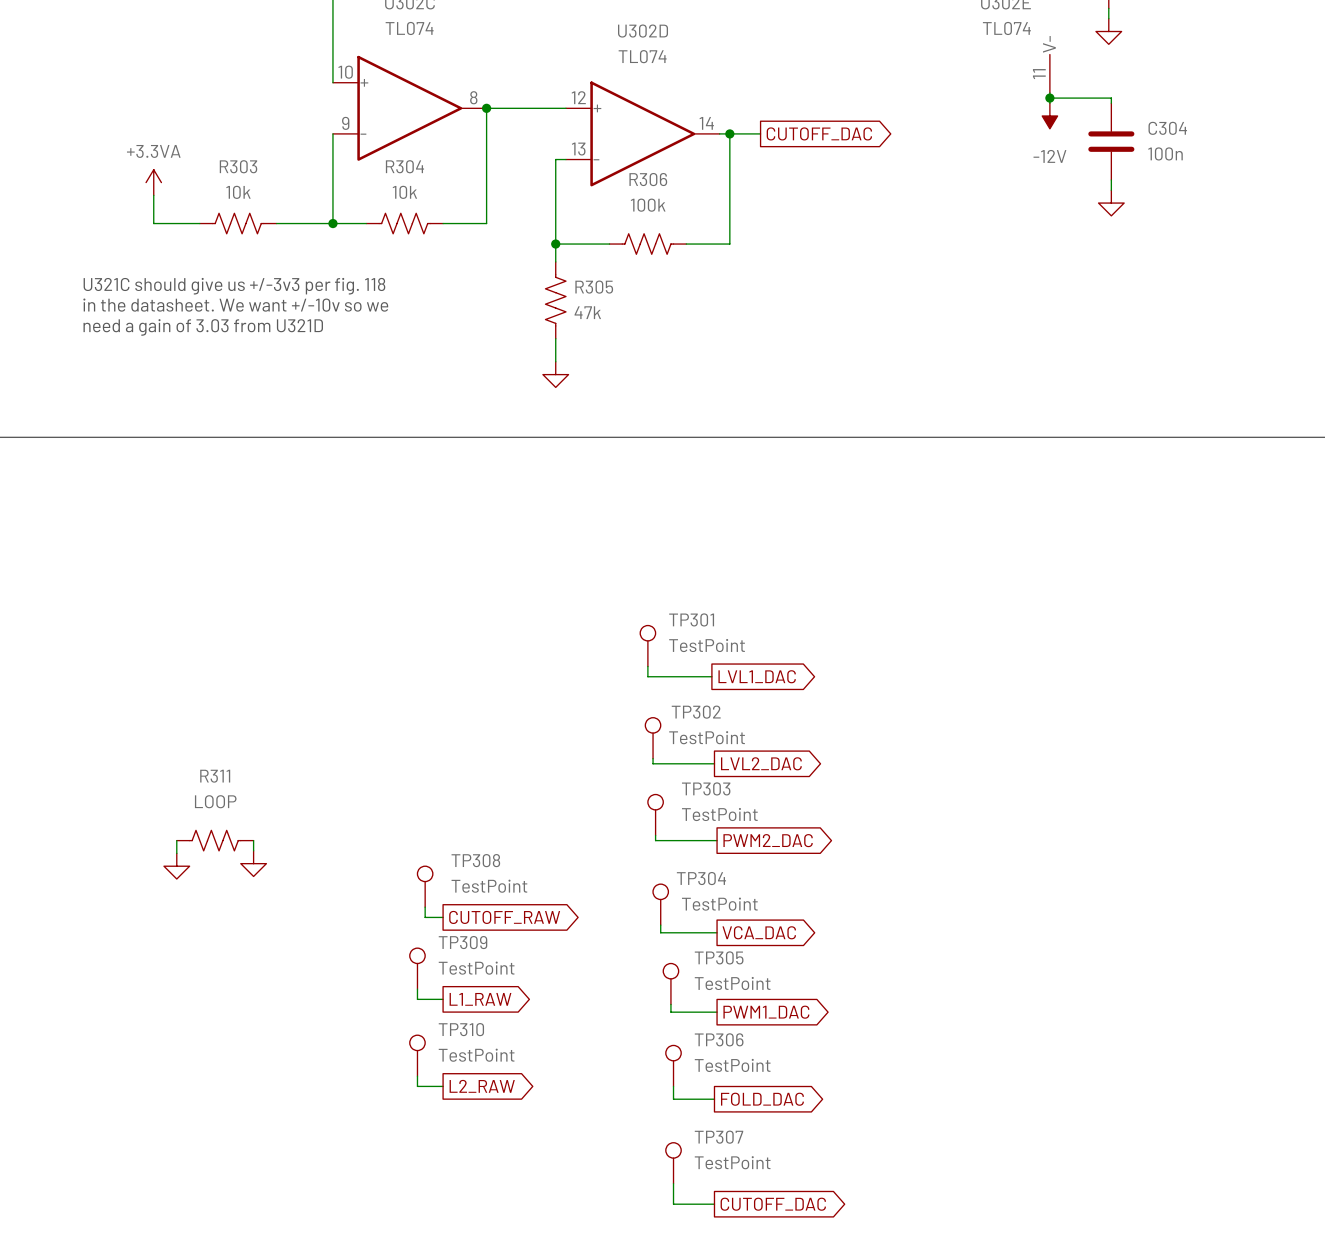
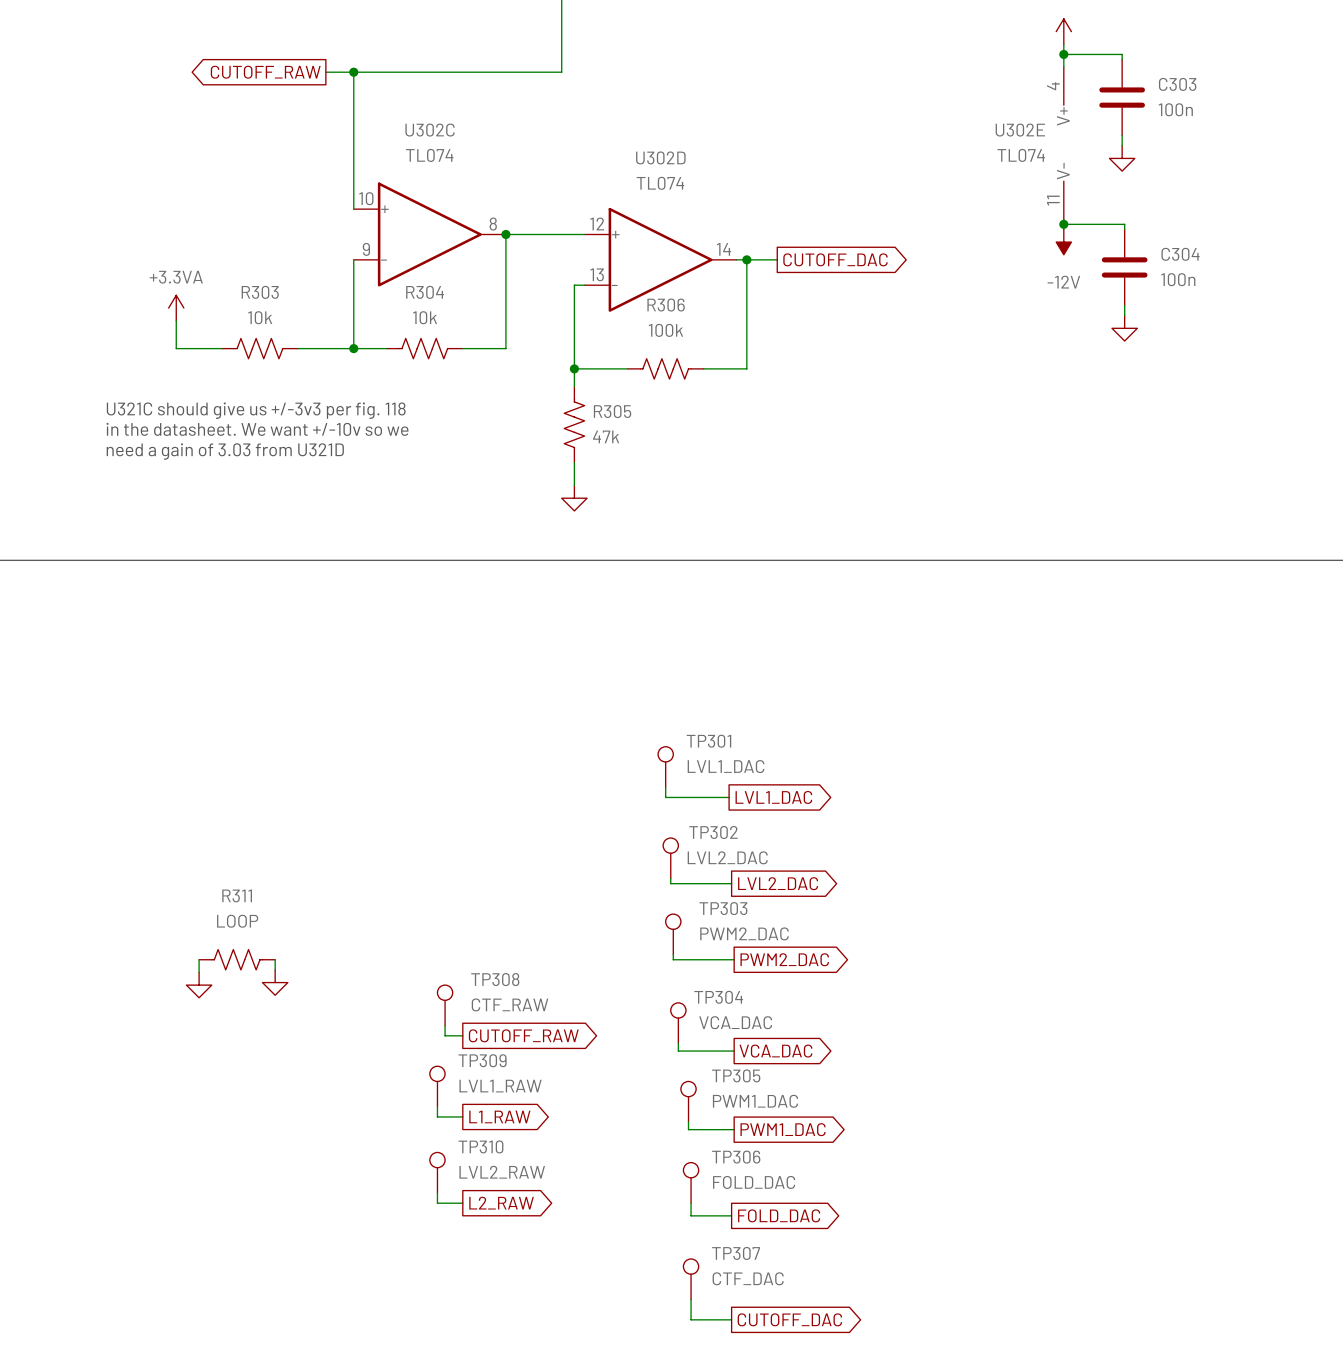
TP301 value: TestPoint (707, 645) -> LVL1_DAC (726, 766)
TP302 value: TestPoint (707, 737) -> LVL2_DAC (727, 857)
TP303 value: TestPoint (719, 814) -> PWM2_DAC (744, 933)
TP308 value: TestPoint (489, 886) -> CTF_RAW (510, 1004)
TP304 value: TestPoint (719, 904) -> VCA_DAC (735, 1022)
TP309 value: TestPoint (476, 968) -> LVL1_RAW (500, 1086)
TP305 value: TestPoint (732, 983) -> PWM1_DAC (755, 1101)
TP310 value: TestPoint (476, 1055) -> LVL2_RAW (502, 1172)
TP306 value: TestPoint (732, 1065) -> FOLD_DAC (754, 1182)
TP307 value: TestPoint (732, 1162) -> CTF_DAC (748, 1278)

